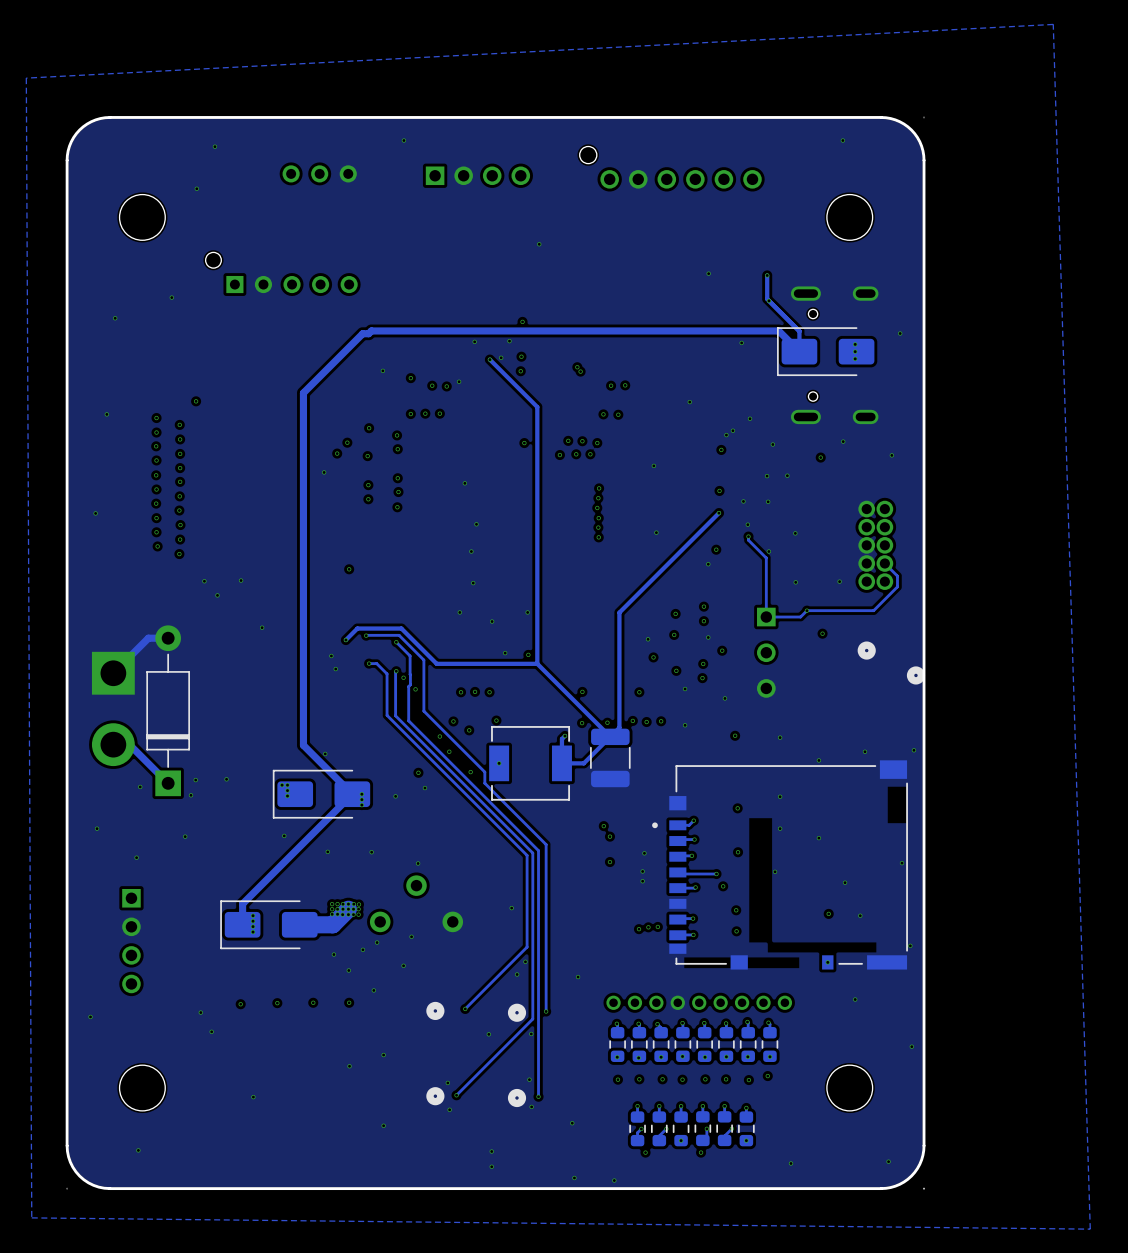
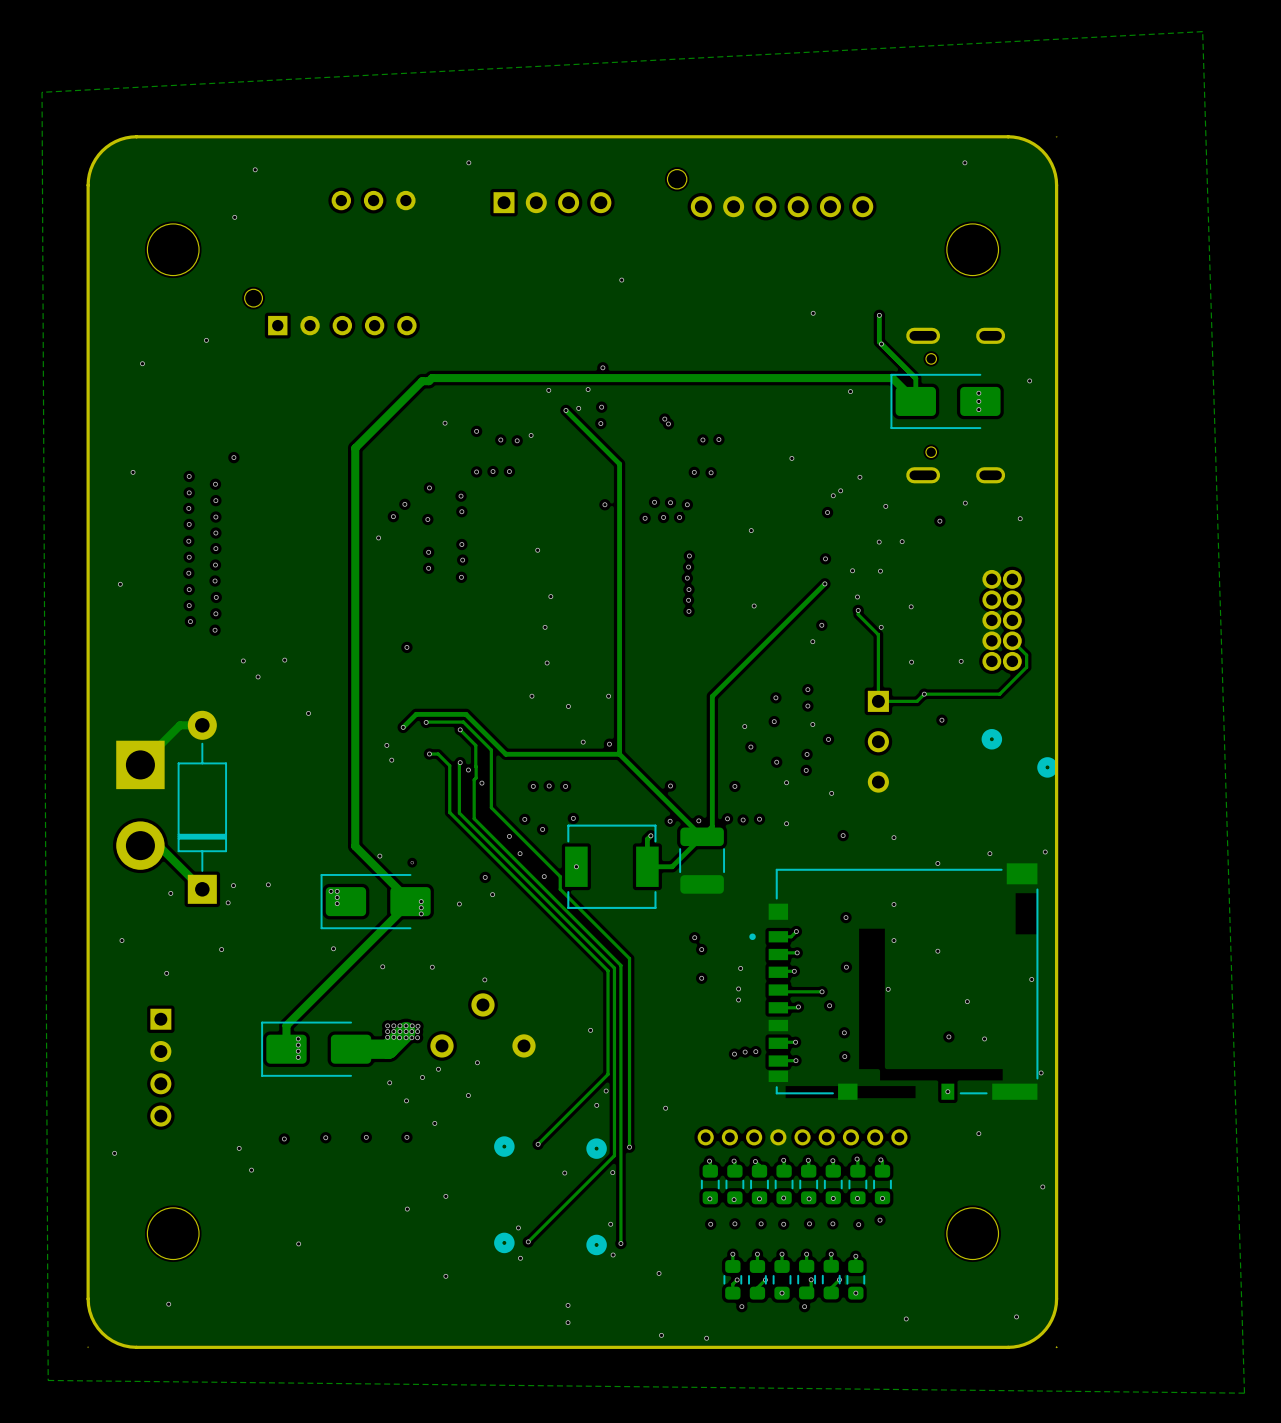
via: none -> (412, 862)

